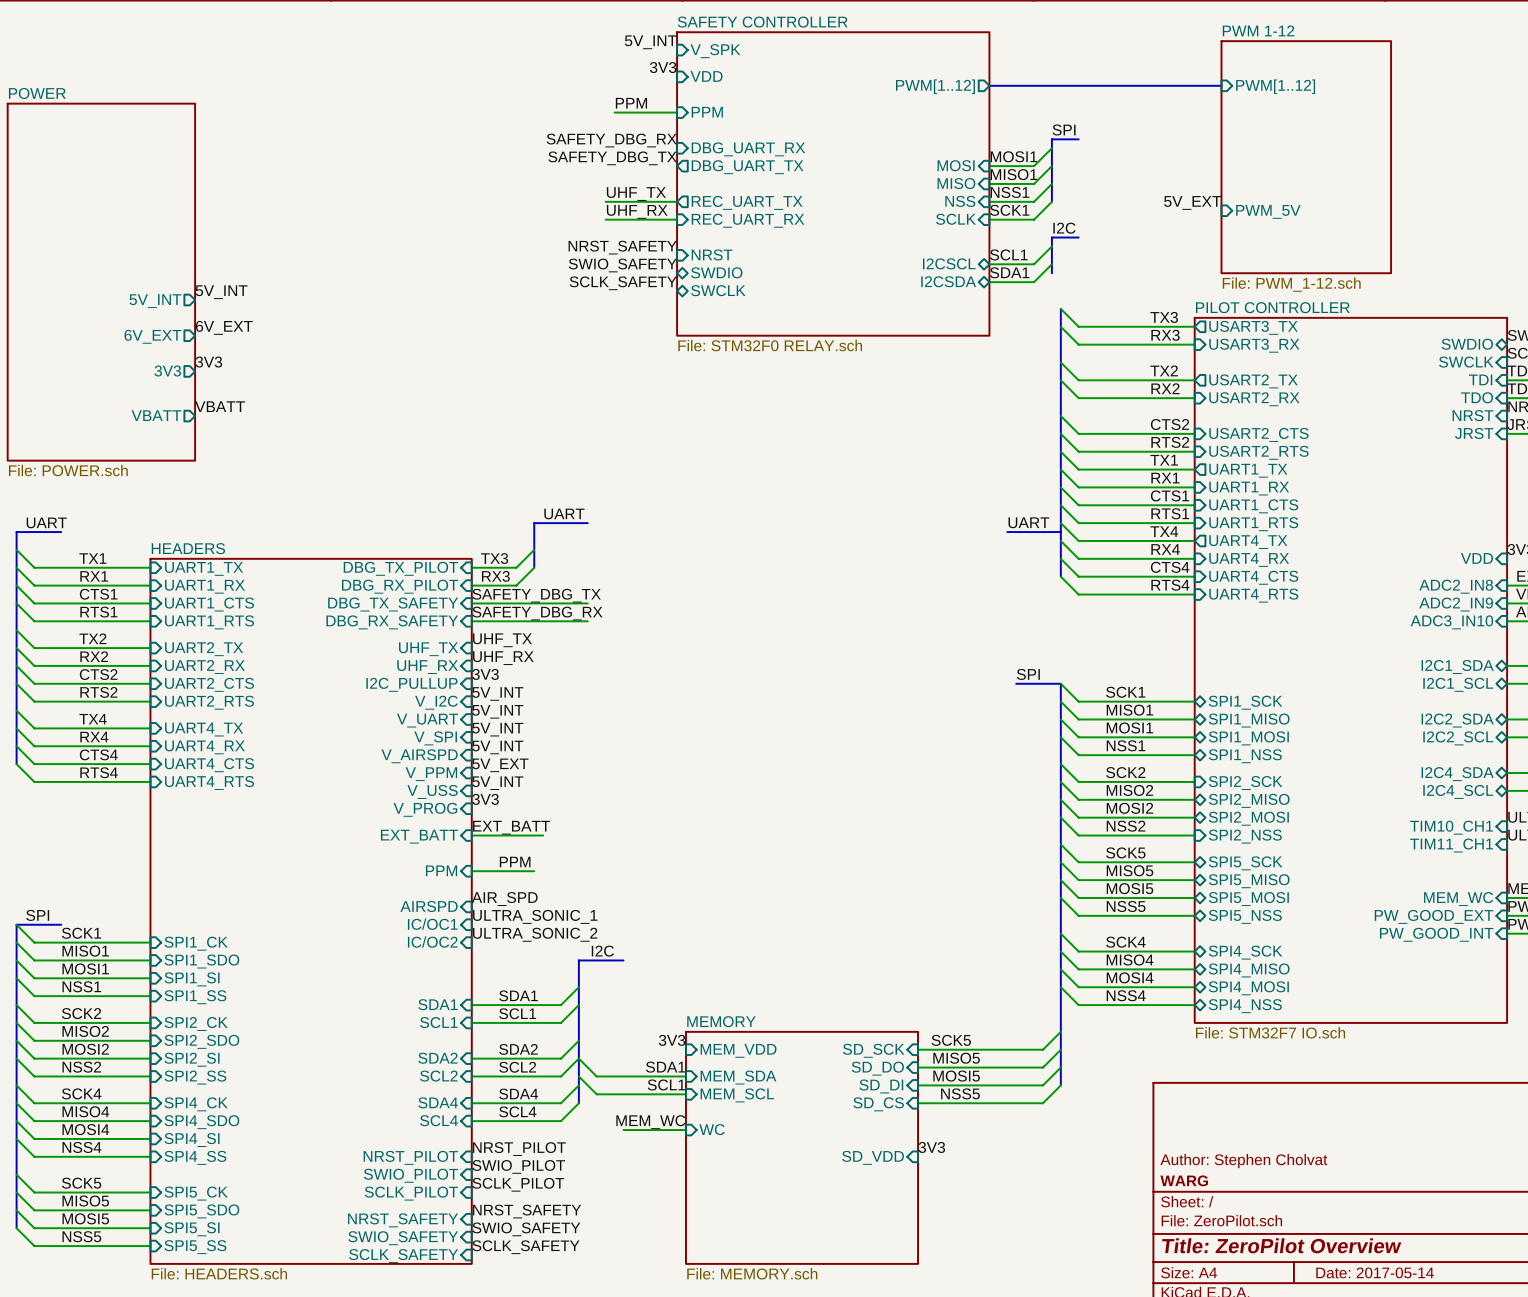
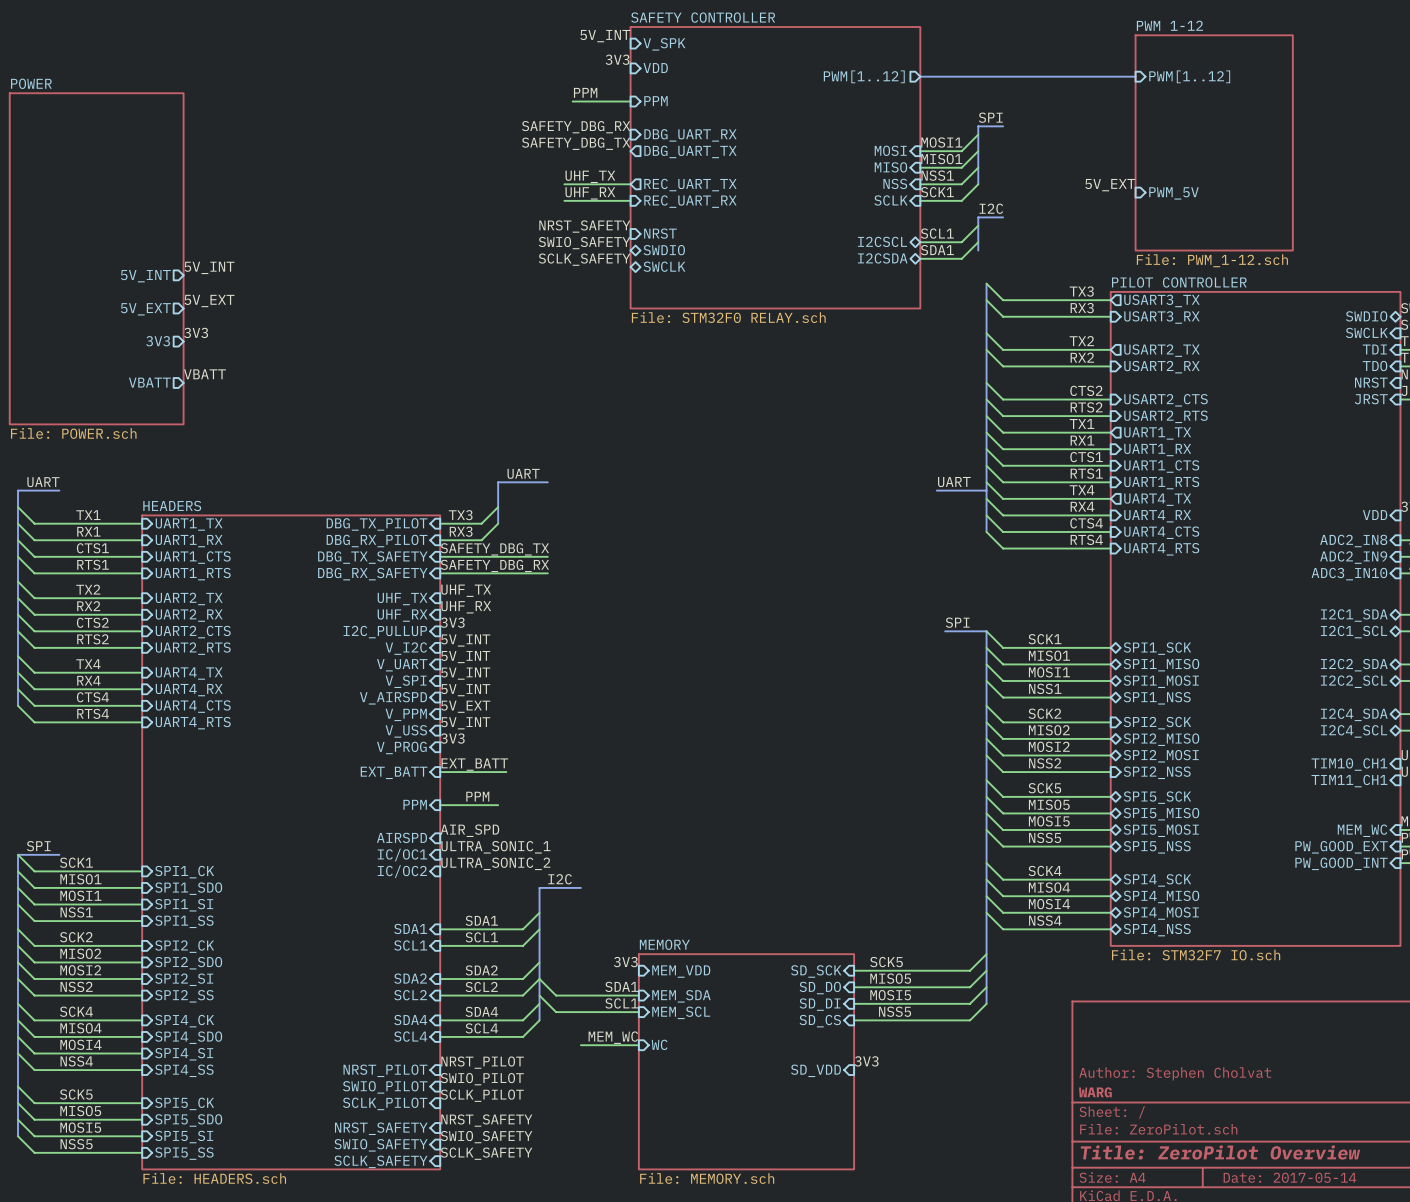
label: 6V_EXT (224, 327) -> 5V_EXT (209, 301)
sheet pin: 6V_EXT (152, 336) -> 5V_EXT (145, 309)

